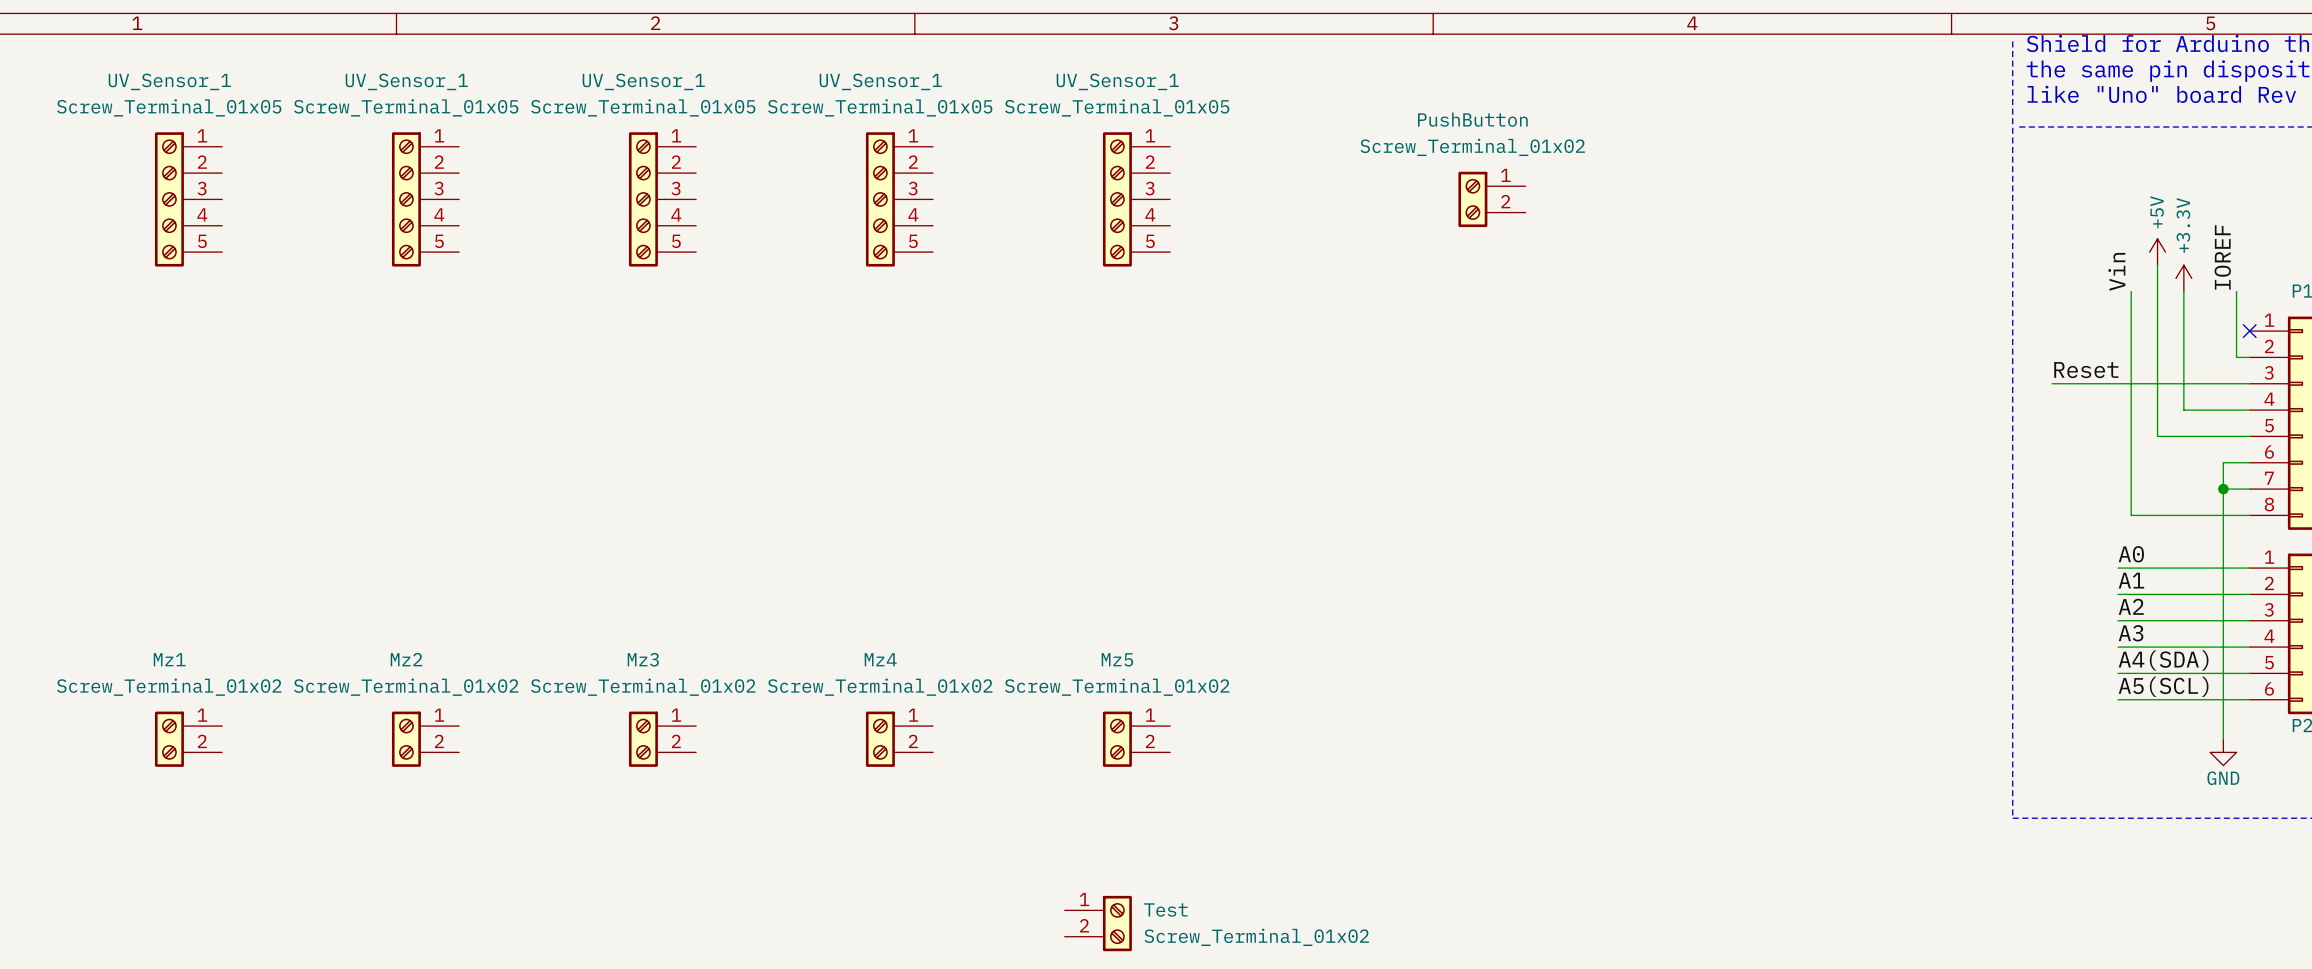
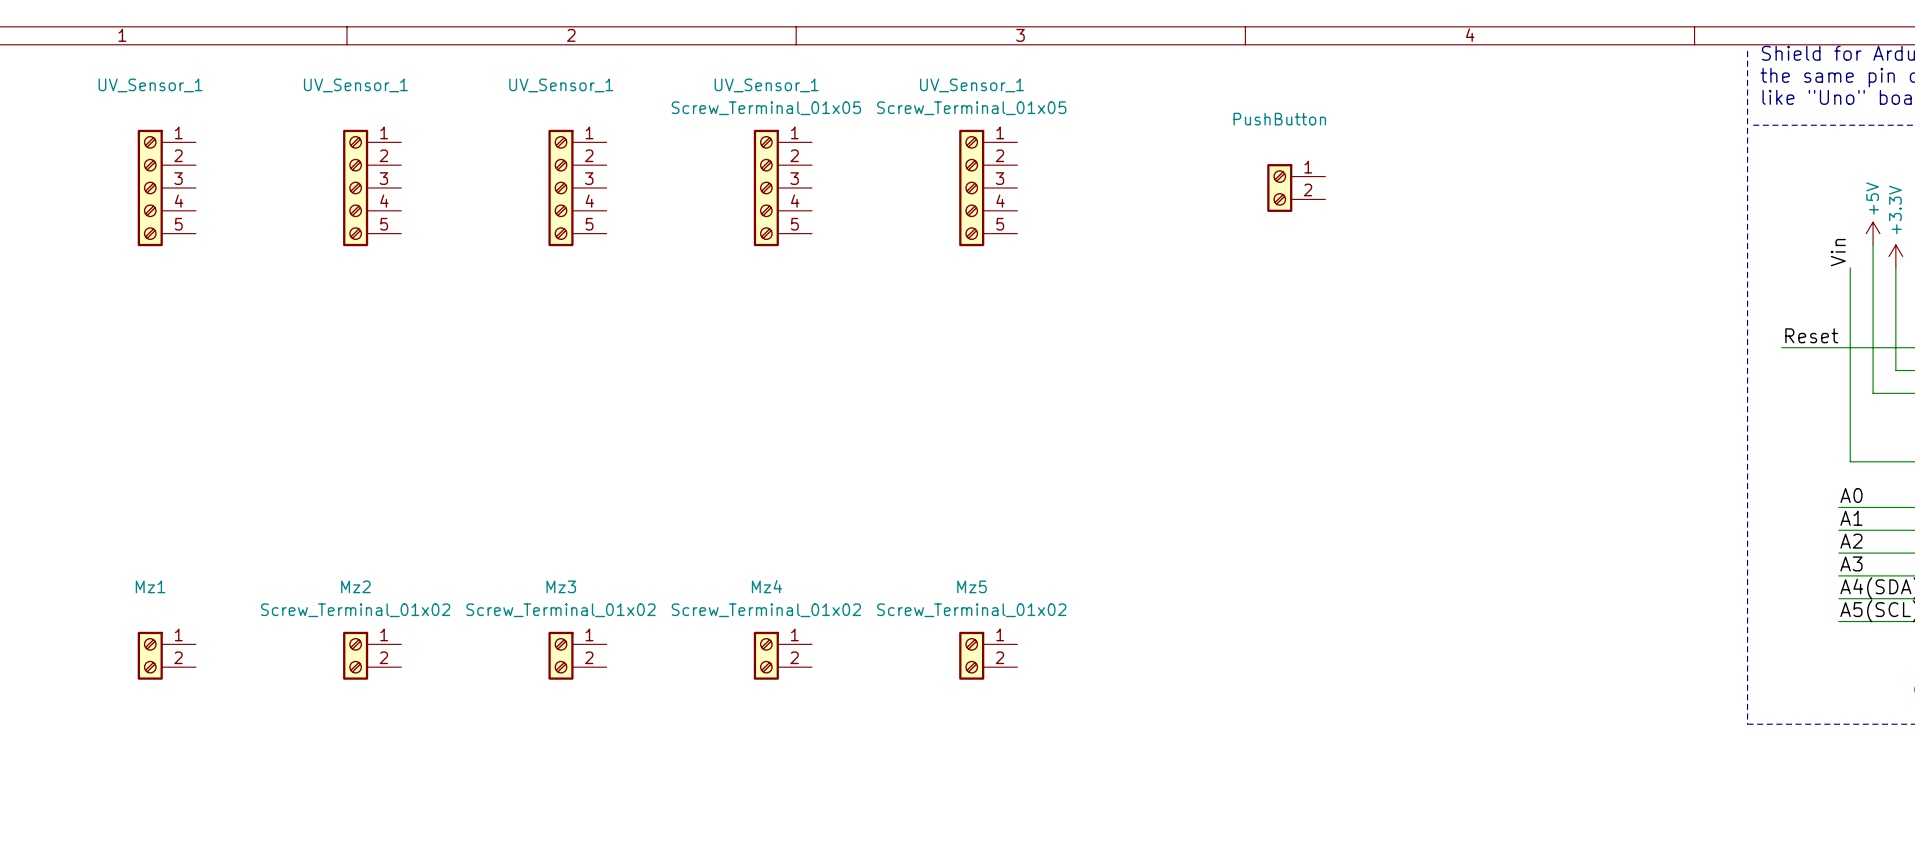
UV_Sensor_1 value: Screw_Terminal_01x05 (169, 107) -> none
UV_Sensor_1 value: Screw_Terminal_01x05 (406, 107) -> none
UV_Sensor_1 value: Screw_Terminal_01x05 (643, 107) -> none
PushButton value: Screw_Terminal_01x02 (1472, 147) -> none
Mz1 value: Screw_Terminal_01x02 (169, 687) -> none
Test: Screw_Terminal_01x02 (1098, 923) -> none

